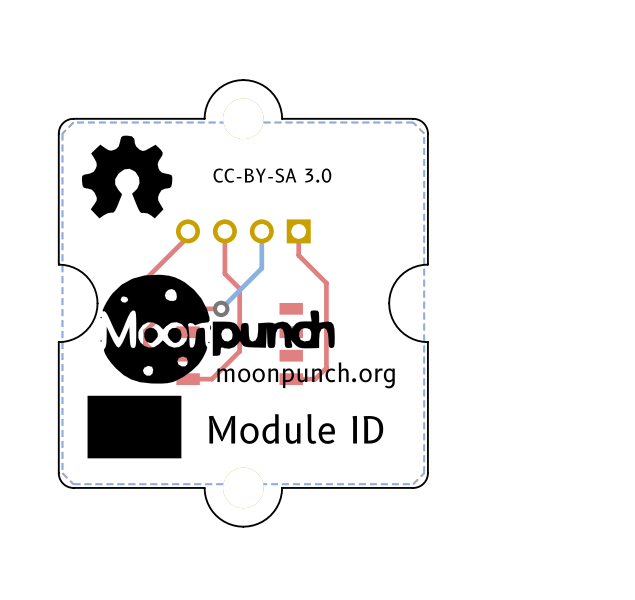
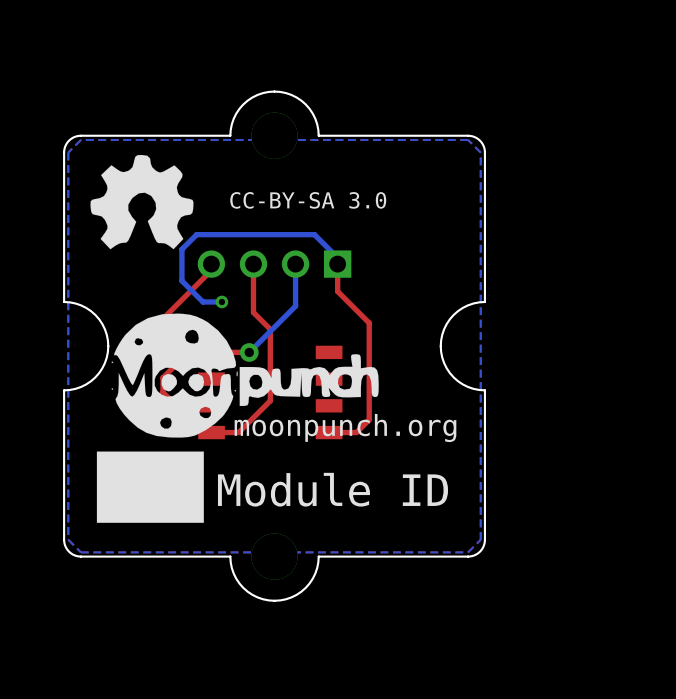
bottom track: none -> (337, 264) (337, 257) (314, 234) (196, 234) (181, 249) (181, 280) (202, 301) (221, 301)
via: none -> (221, 301)

